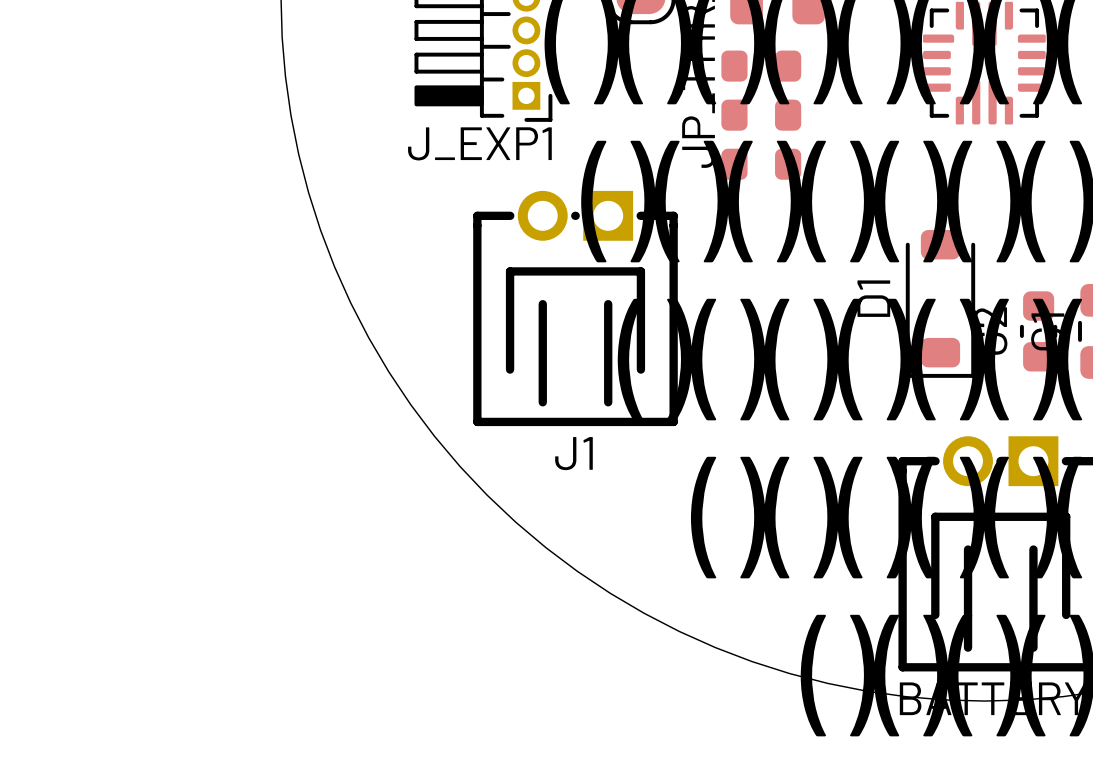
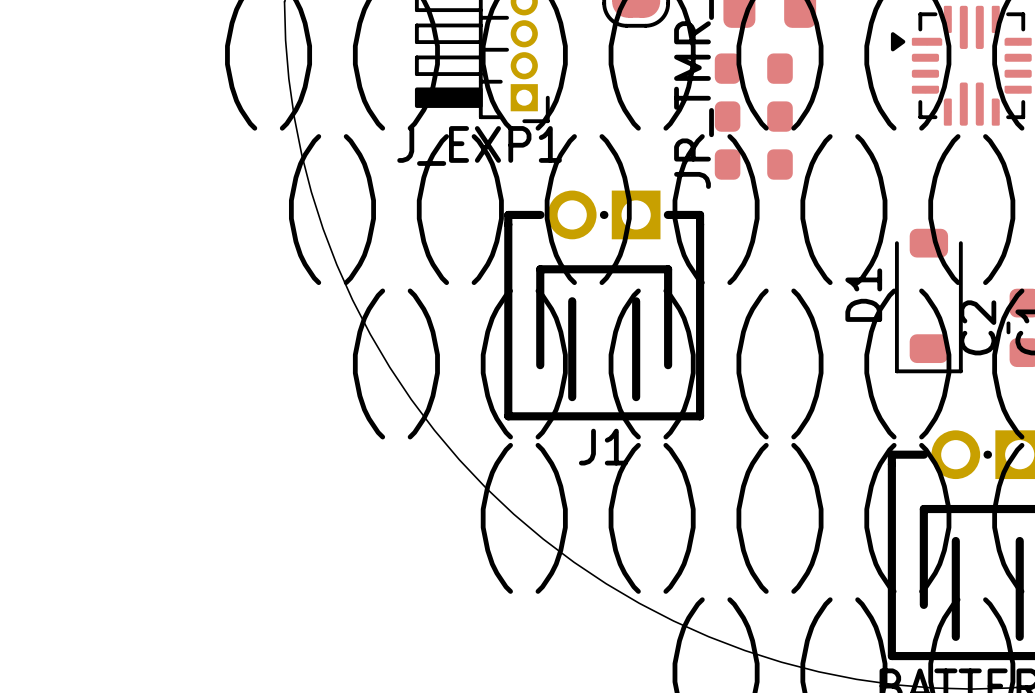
J1 position: (575, 308) -> (604, 305)

